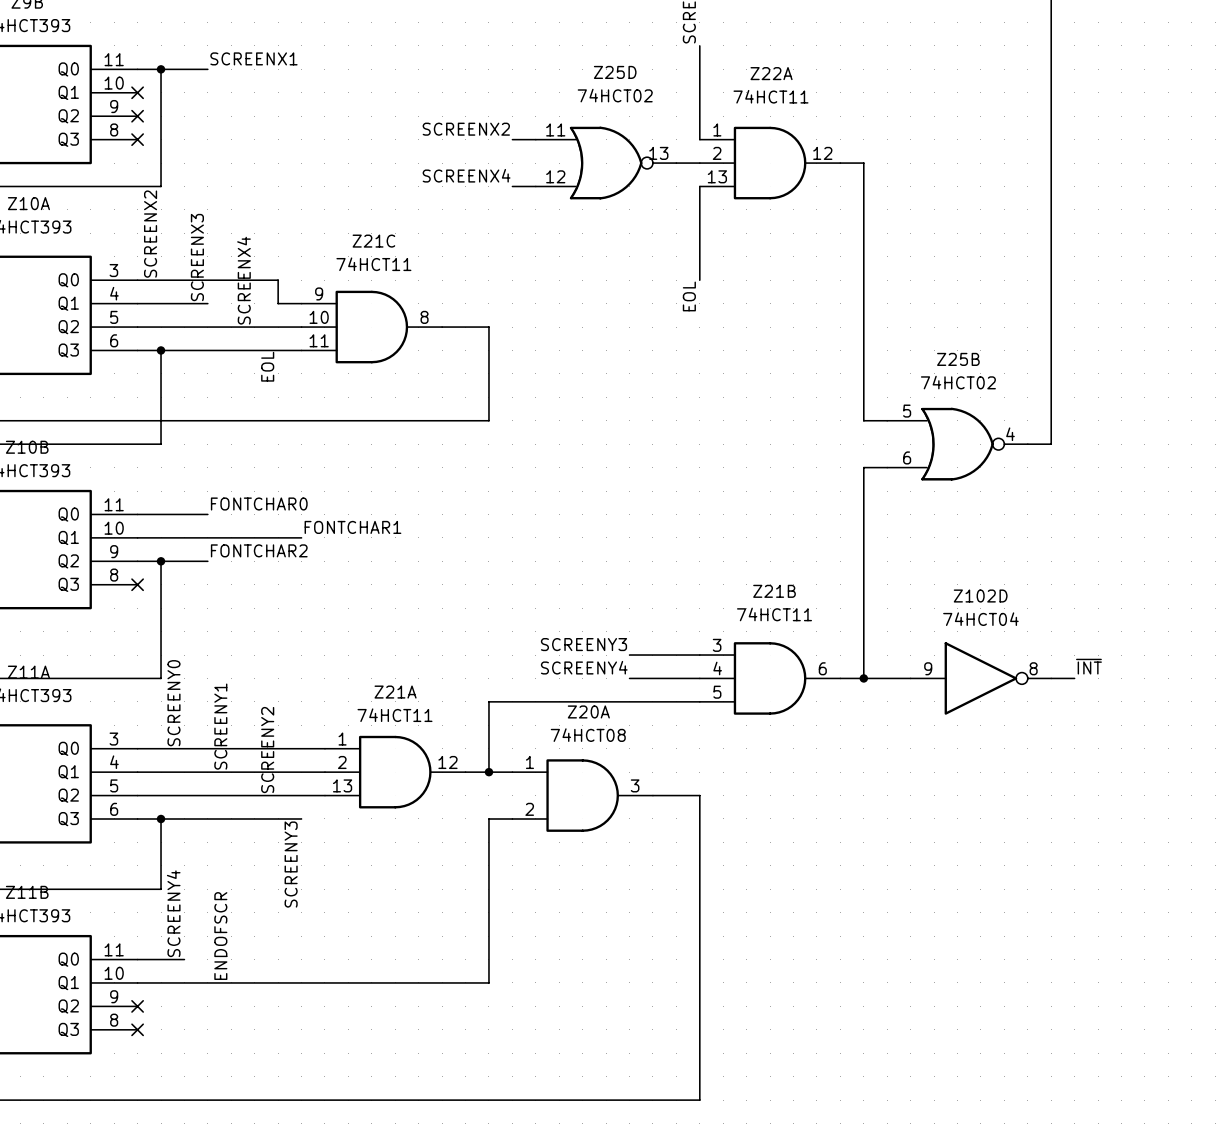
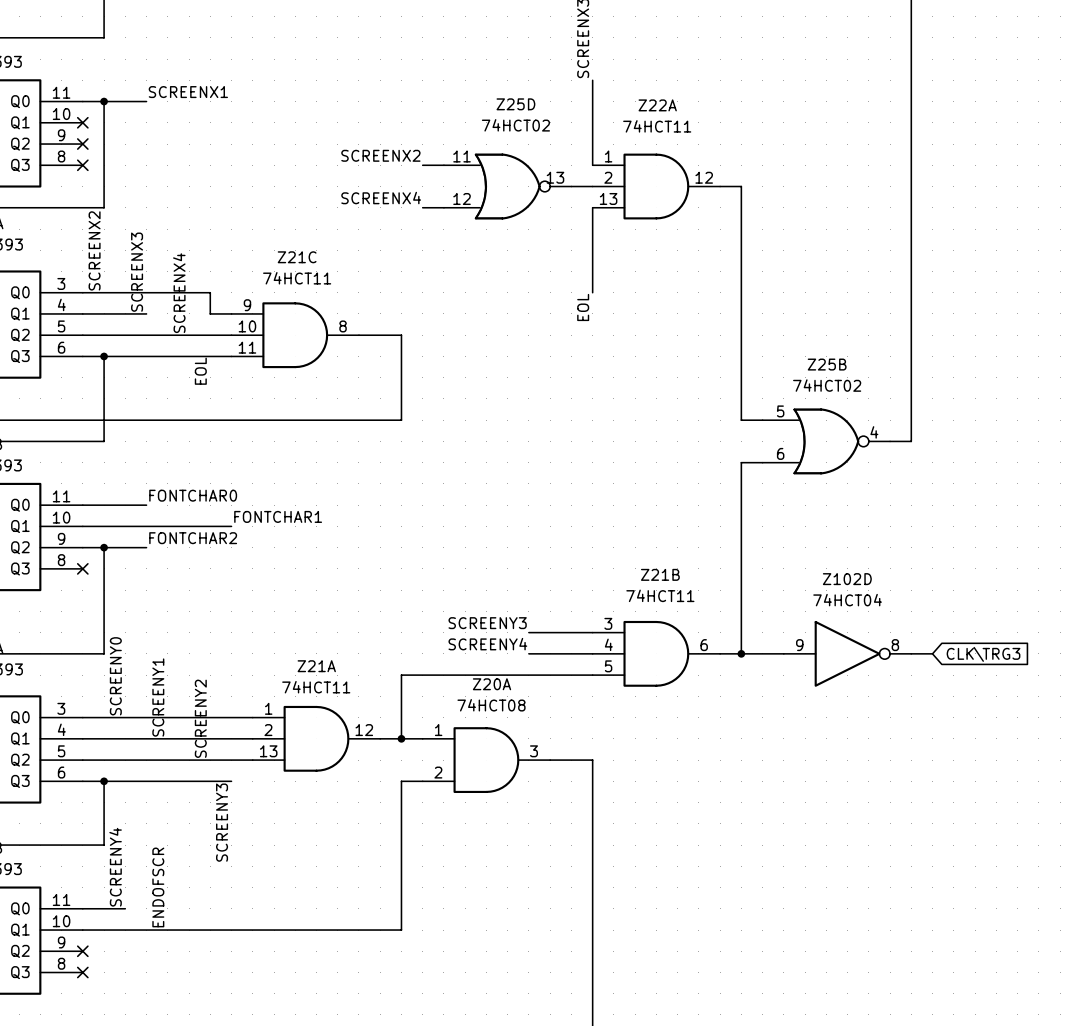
label: ~{INT} (1088, 666) -> none
global label: none -> CLK\TRG3 (983, 654)

